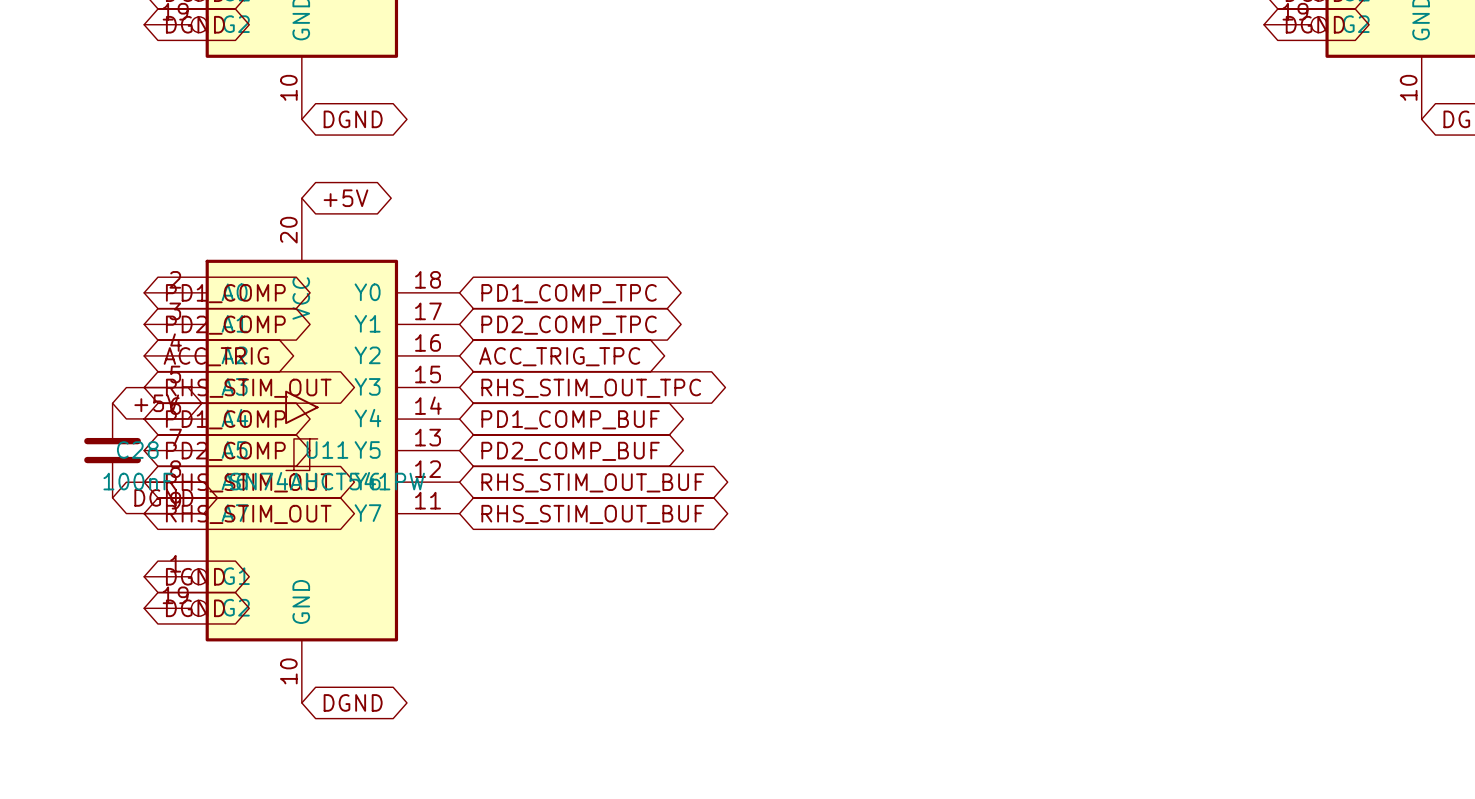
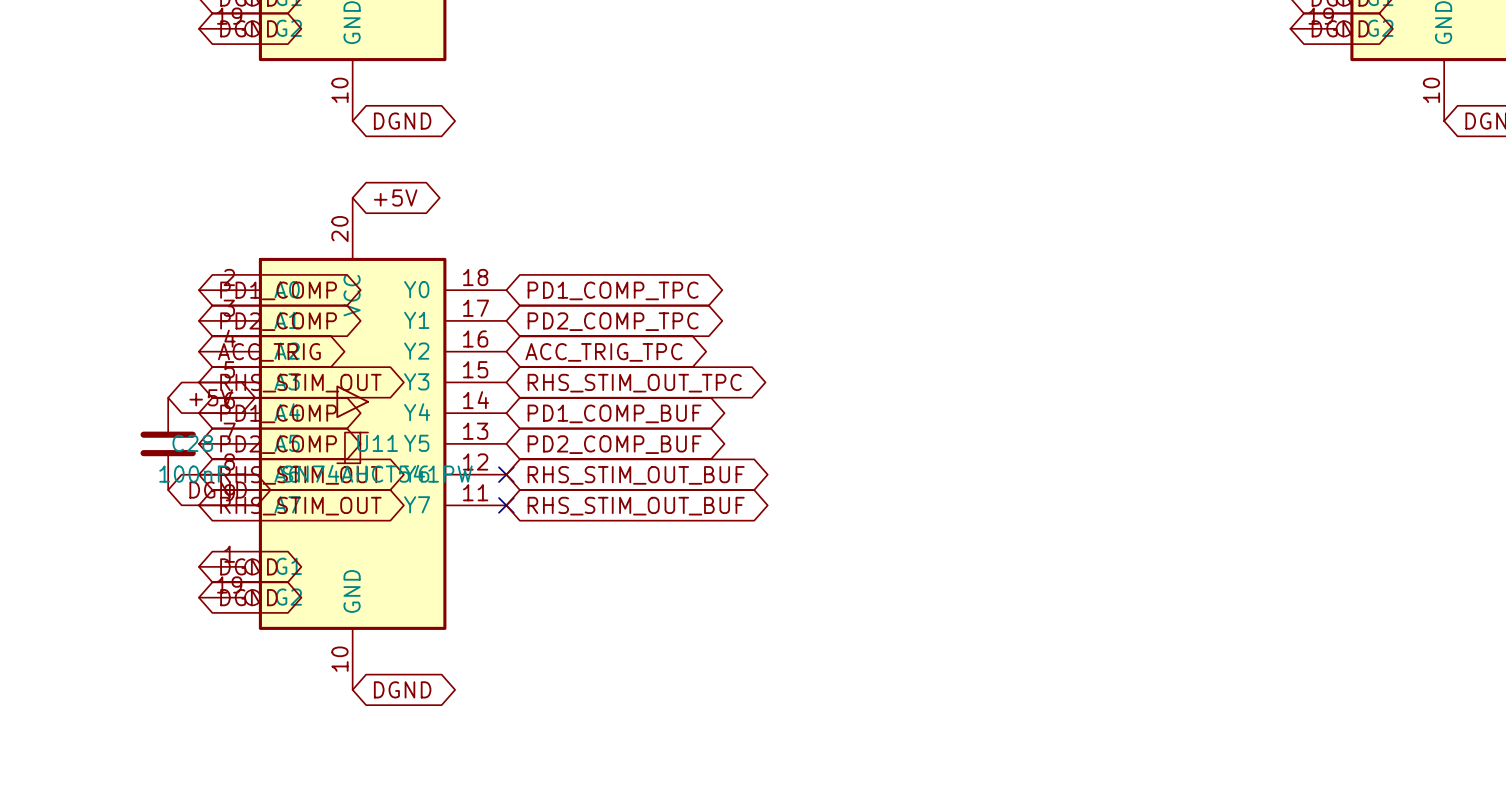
no-connect mark: none -> (506, 474)
no-connect mark: none -> (506, 505)

